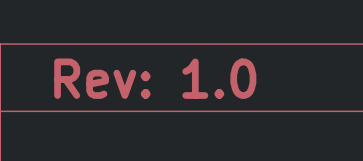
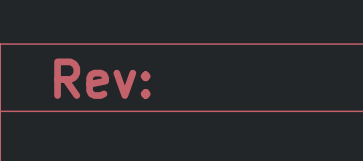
title block: Rev: 1.0 (155, 78) -> Rev: (102, 78)

